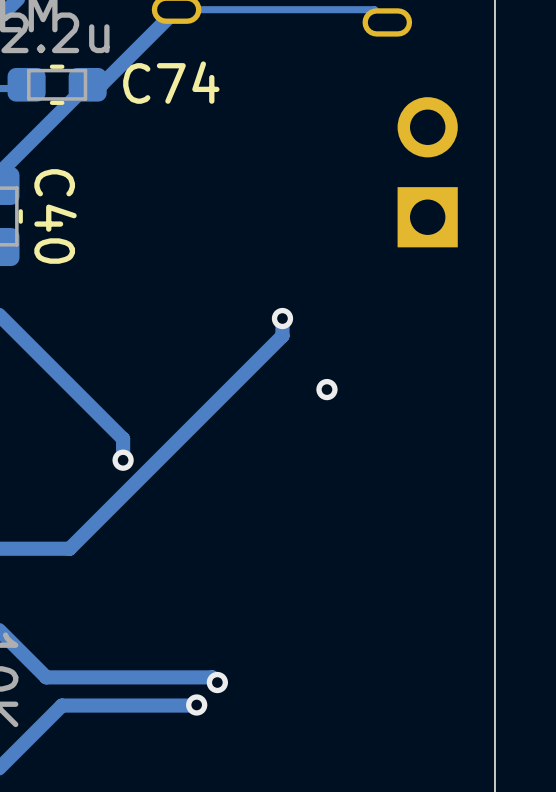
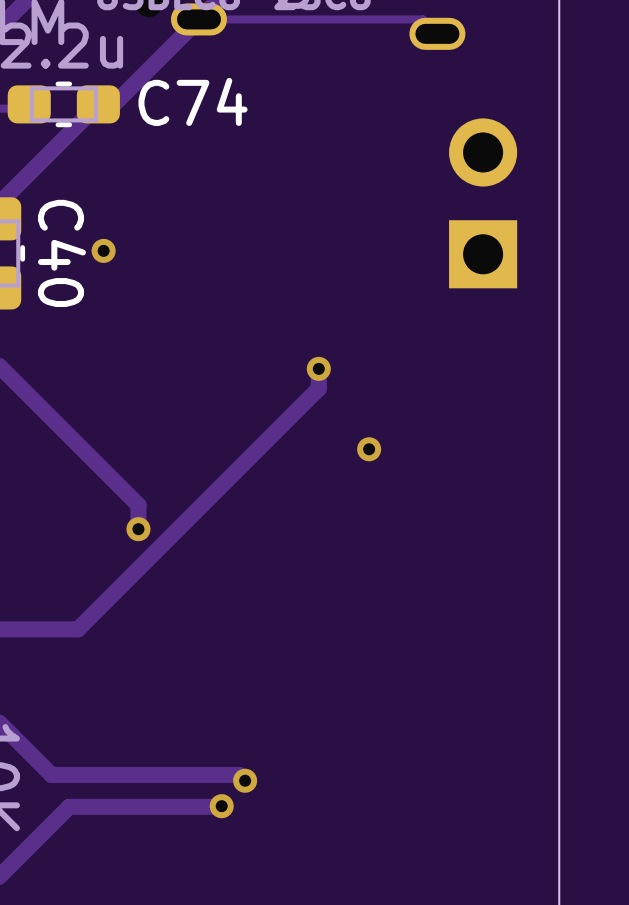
via: none -> (103, 250)

